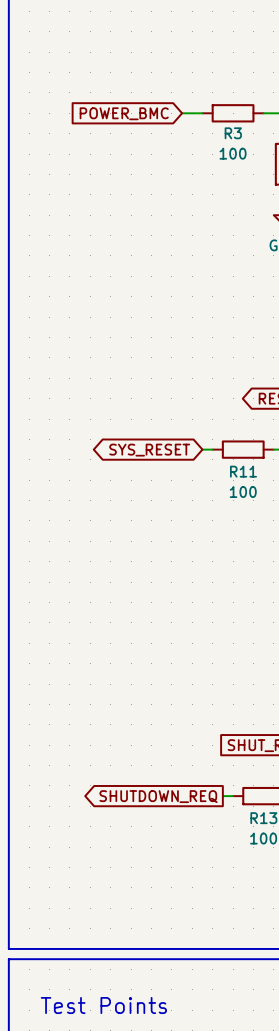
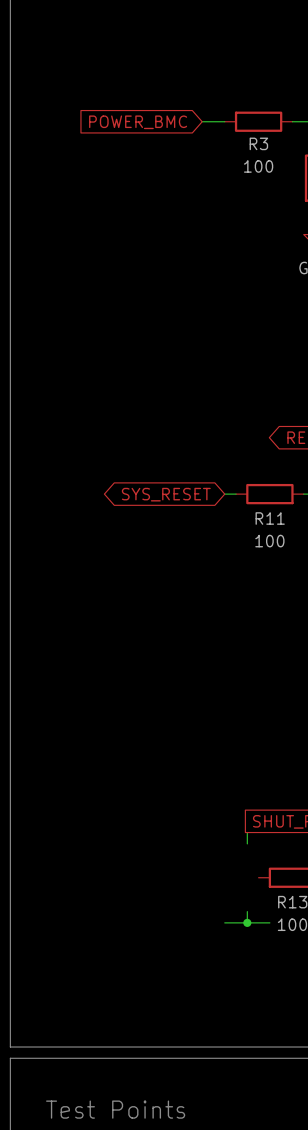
wire: none -> (247, 832) (247, 843)
global label: SHUTDOWN_REQ (158, 796) -> none
wire: (222, 796) (233, 796) -> none
wire: none -> (247, 911) (247, 922)
wire: none -> (224, 922) (269, 922)
junction: none -> (247, 922)

